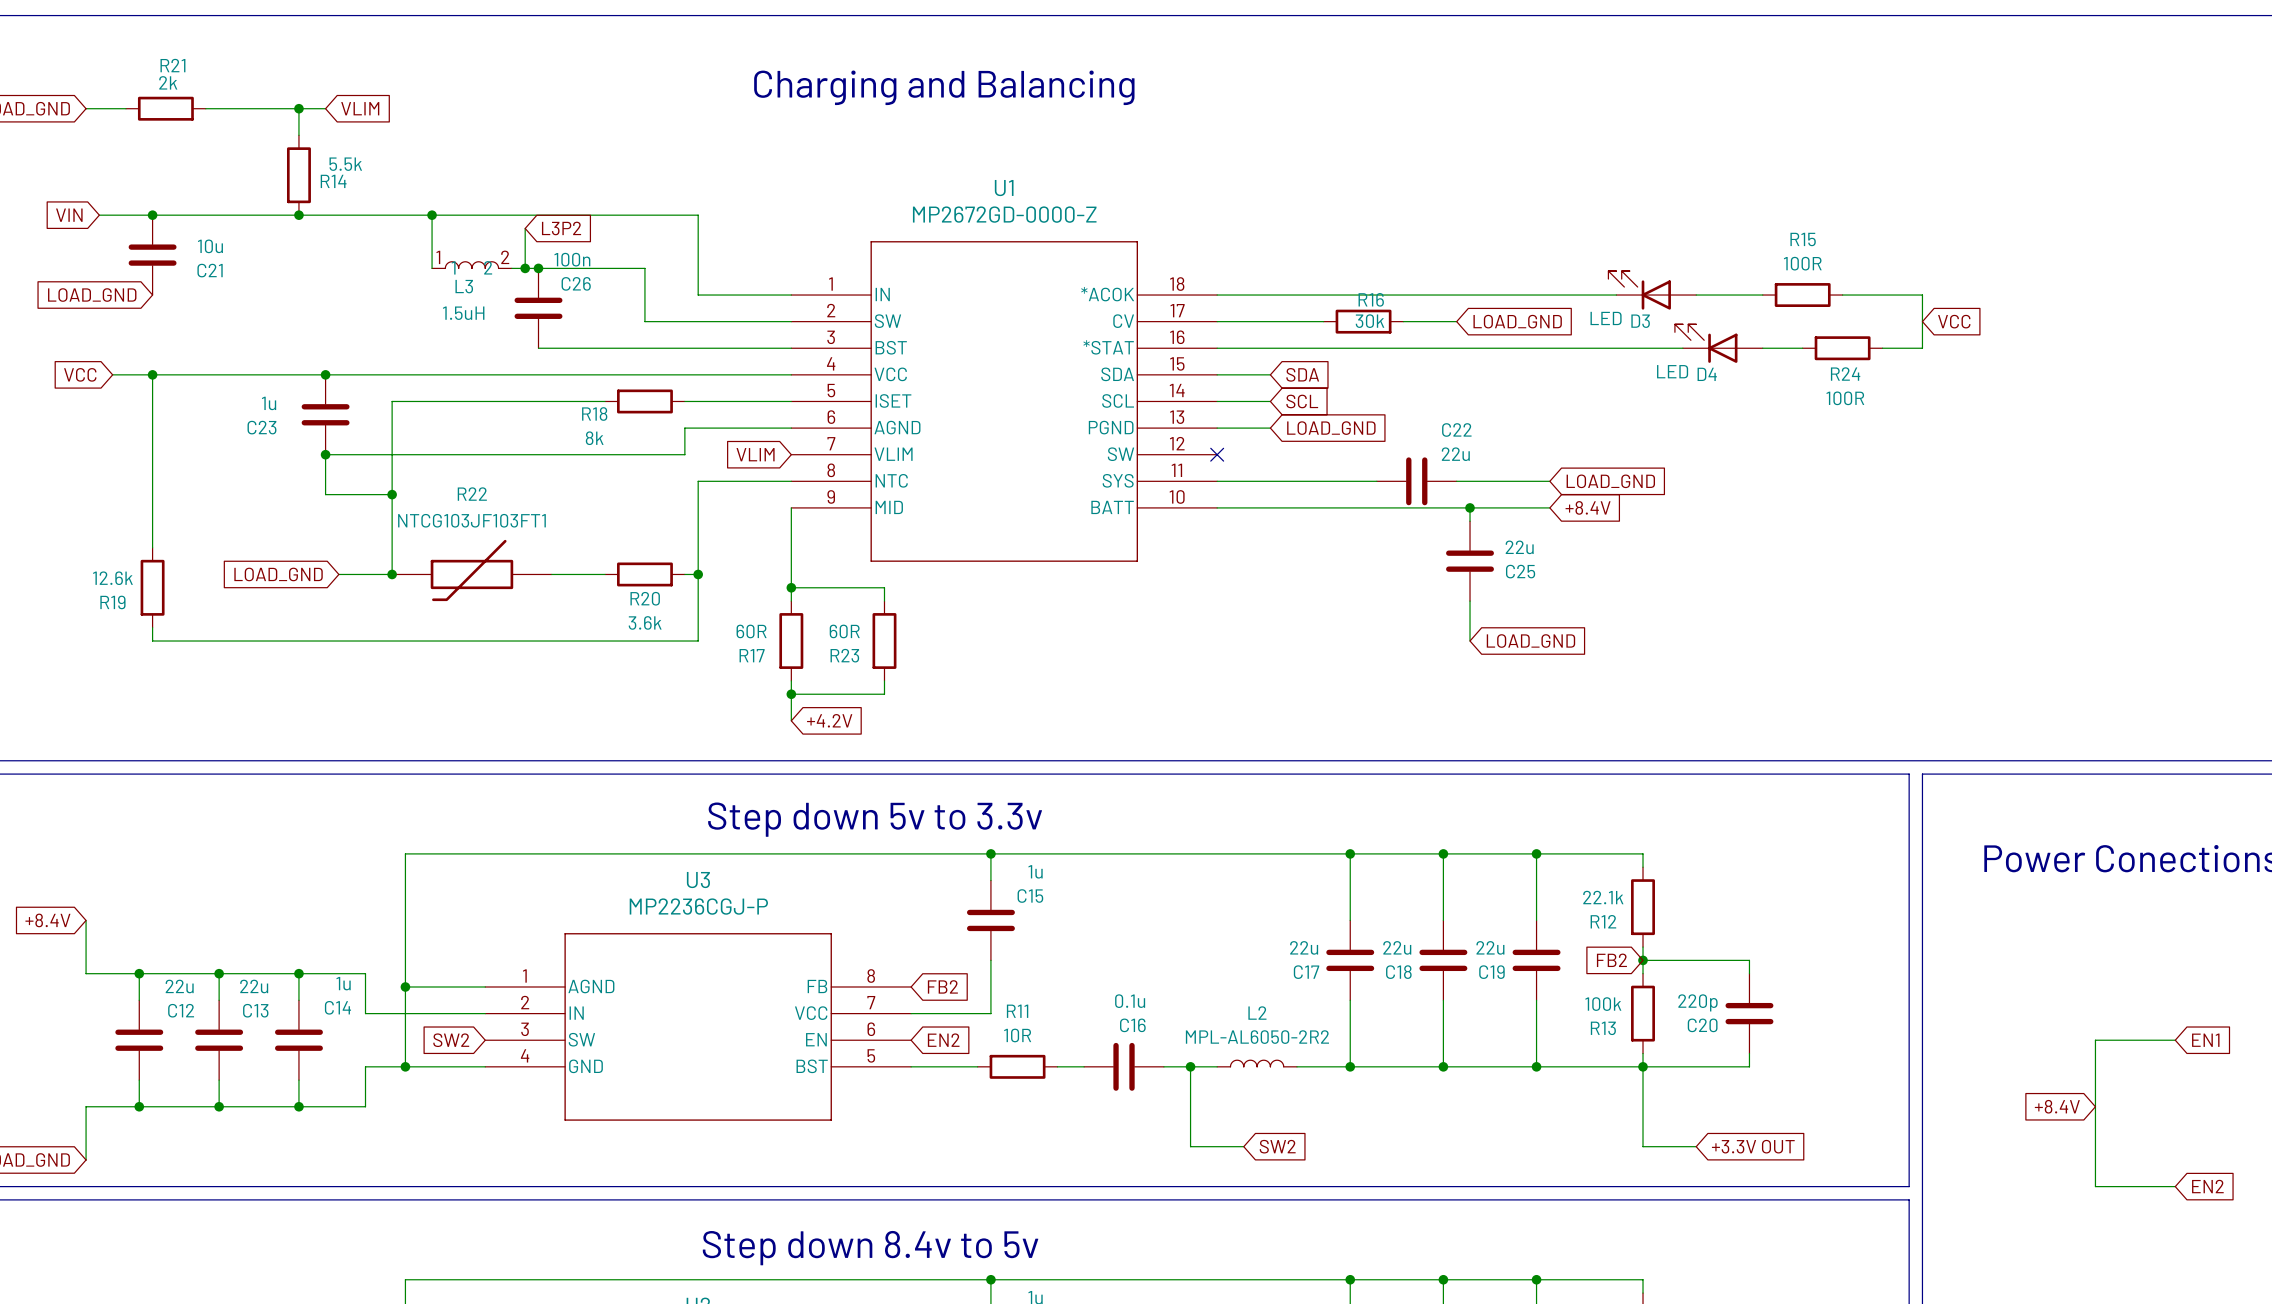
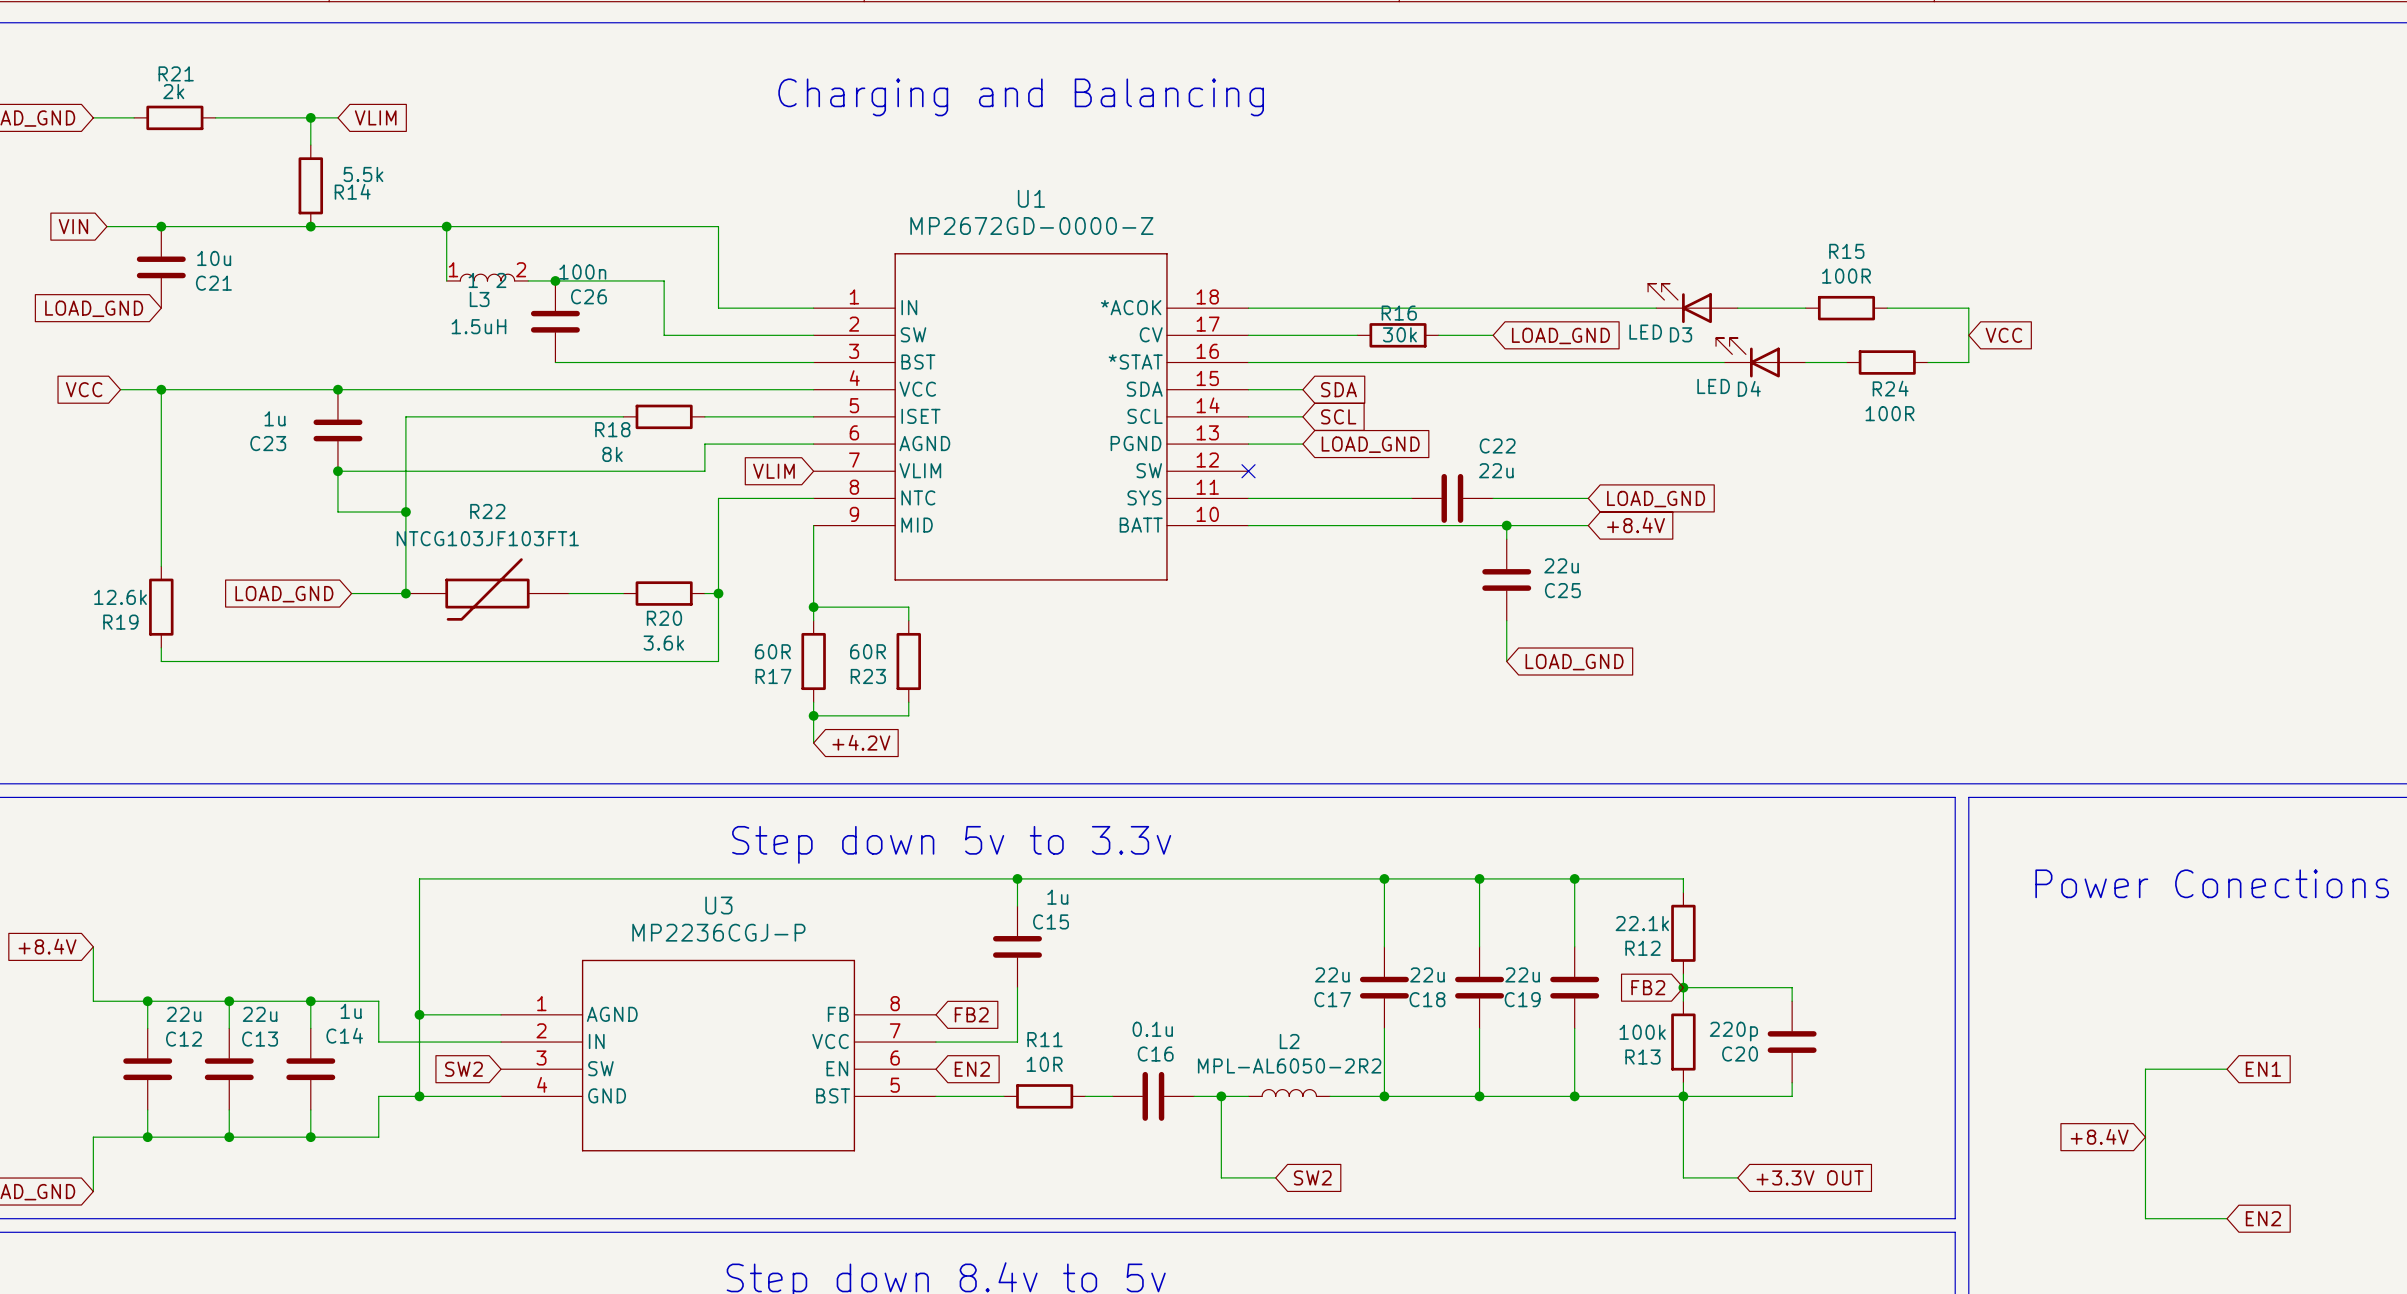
wire: (525, 228) (525, 268) -> none
global label: L3P2 (561, 228) -> none
junction: (525, 268) -> none

